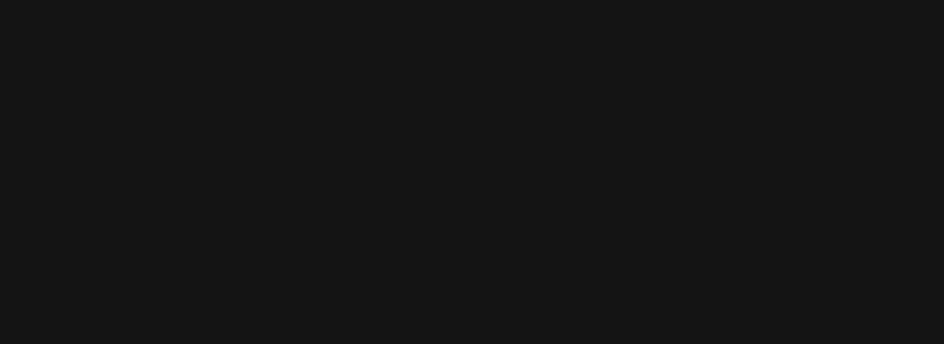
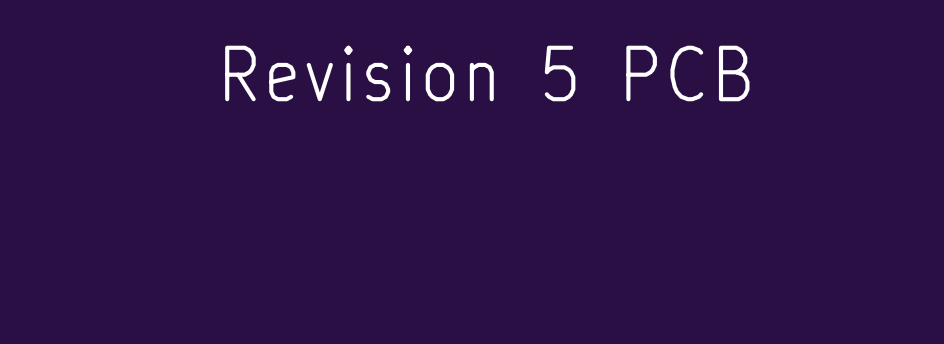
text: none -> Revision 5 PCB (487, 73)

